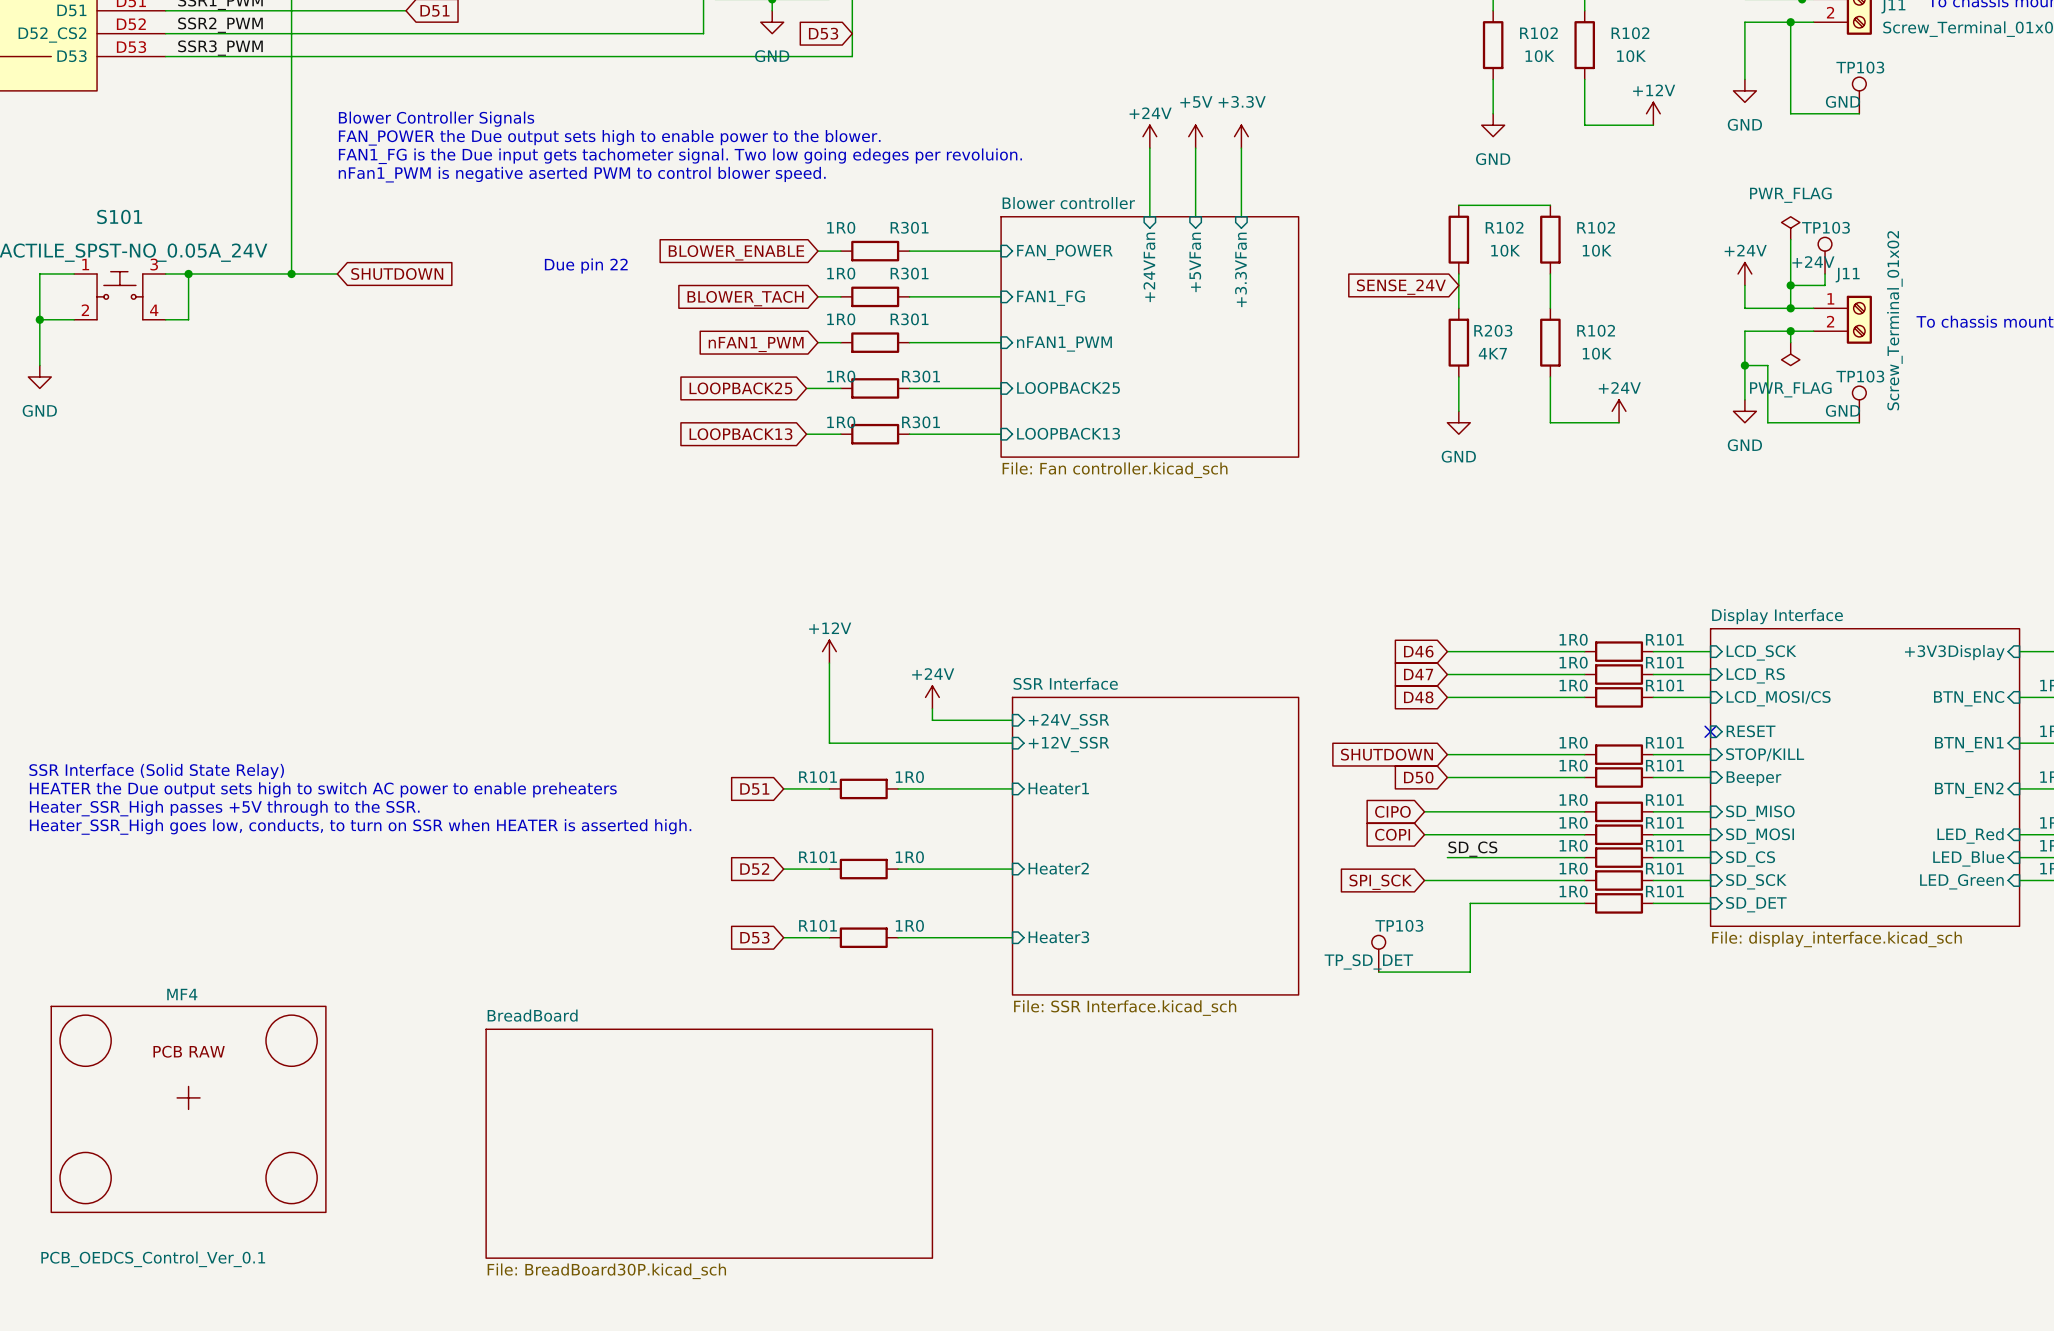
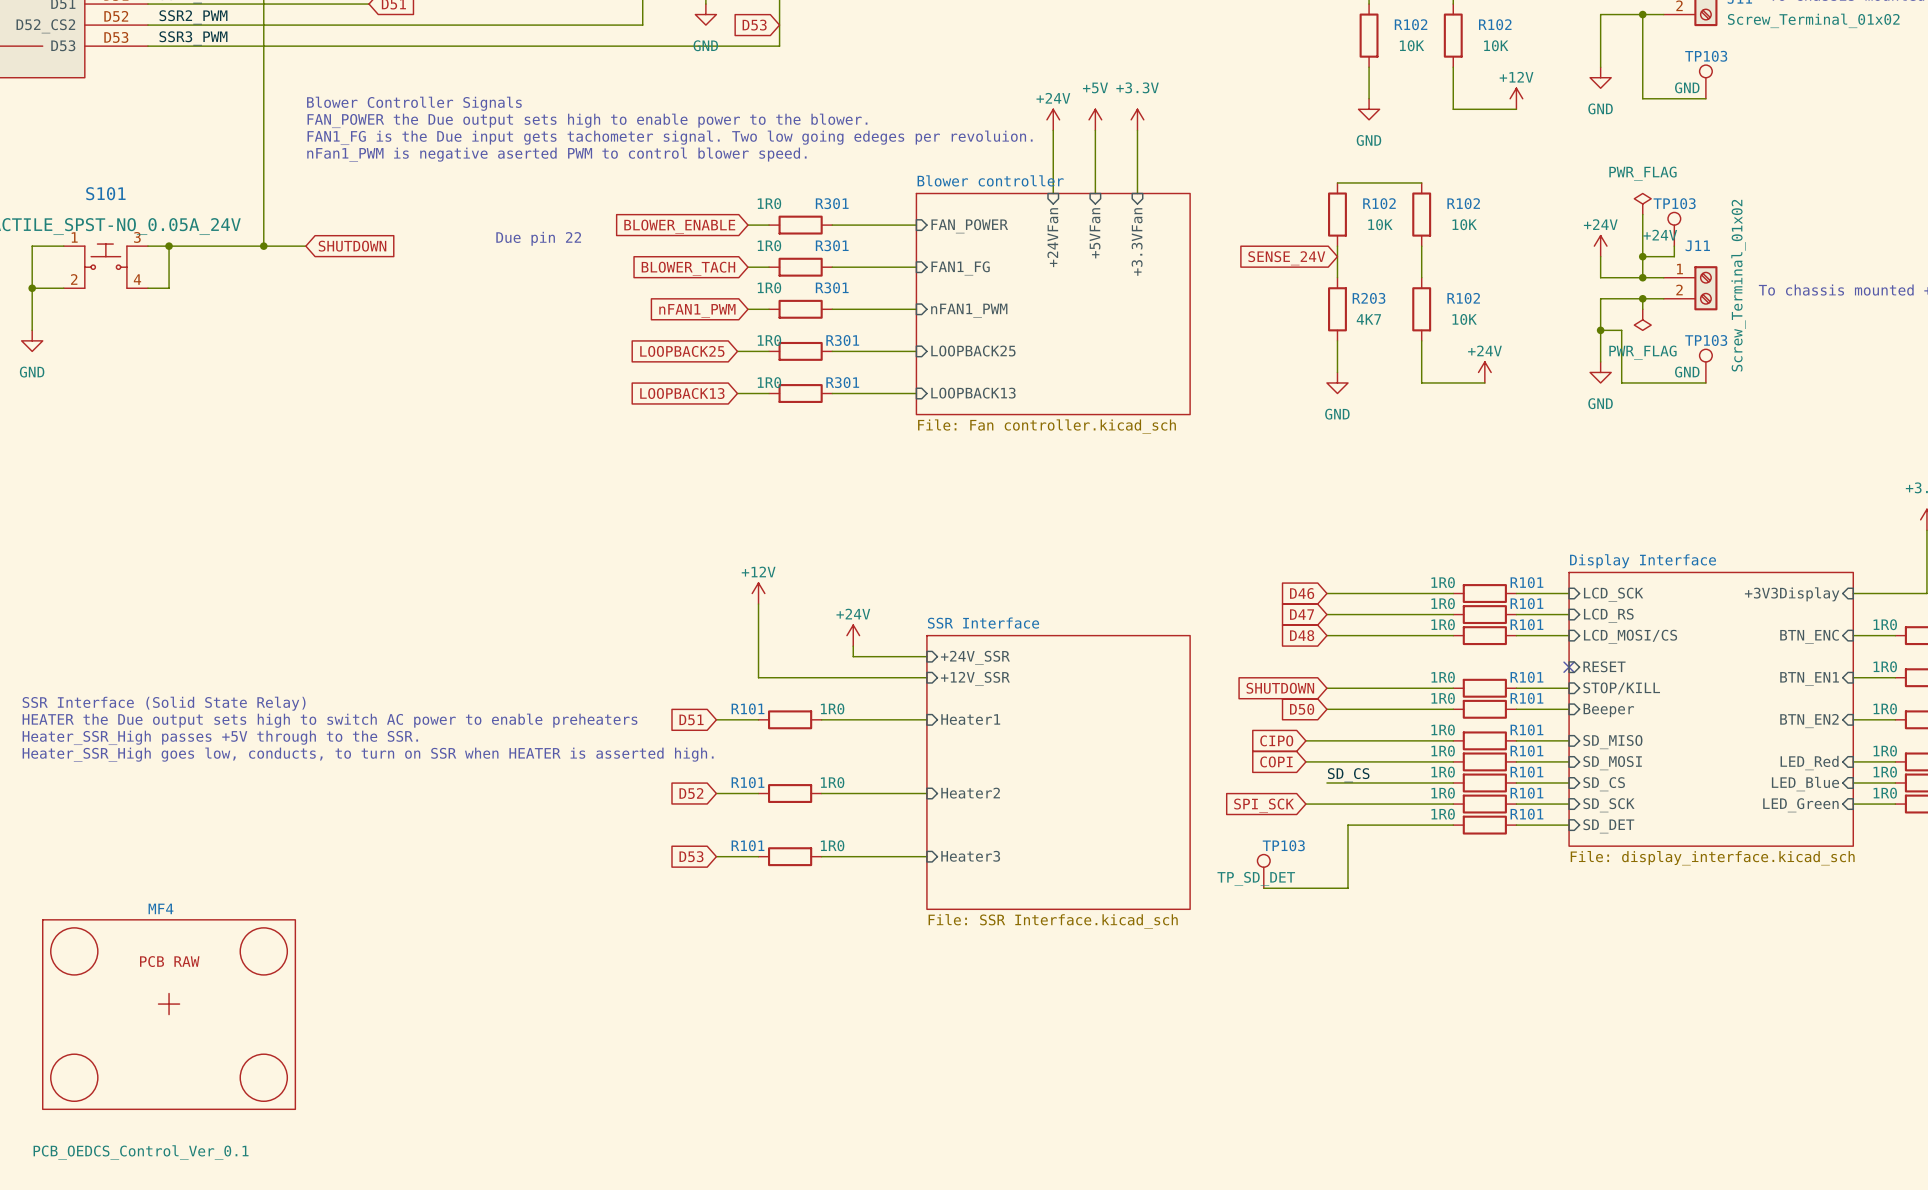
sheet BreadBoard: File: BreadBoard30P.kicad_sch (709, 1143) -> none

